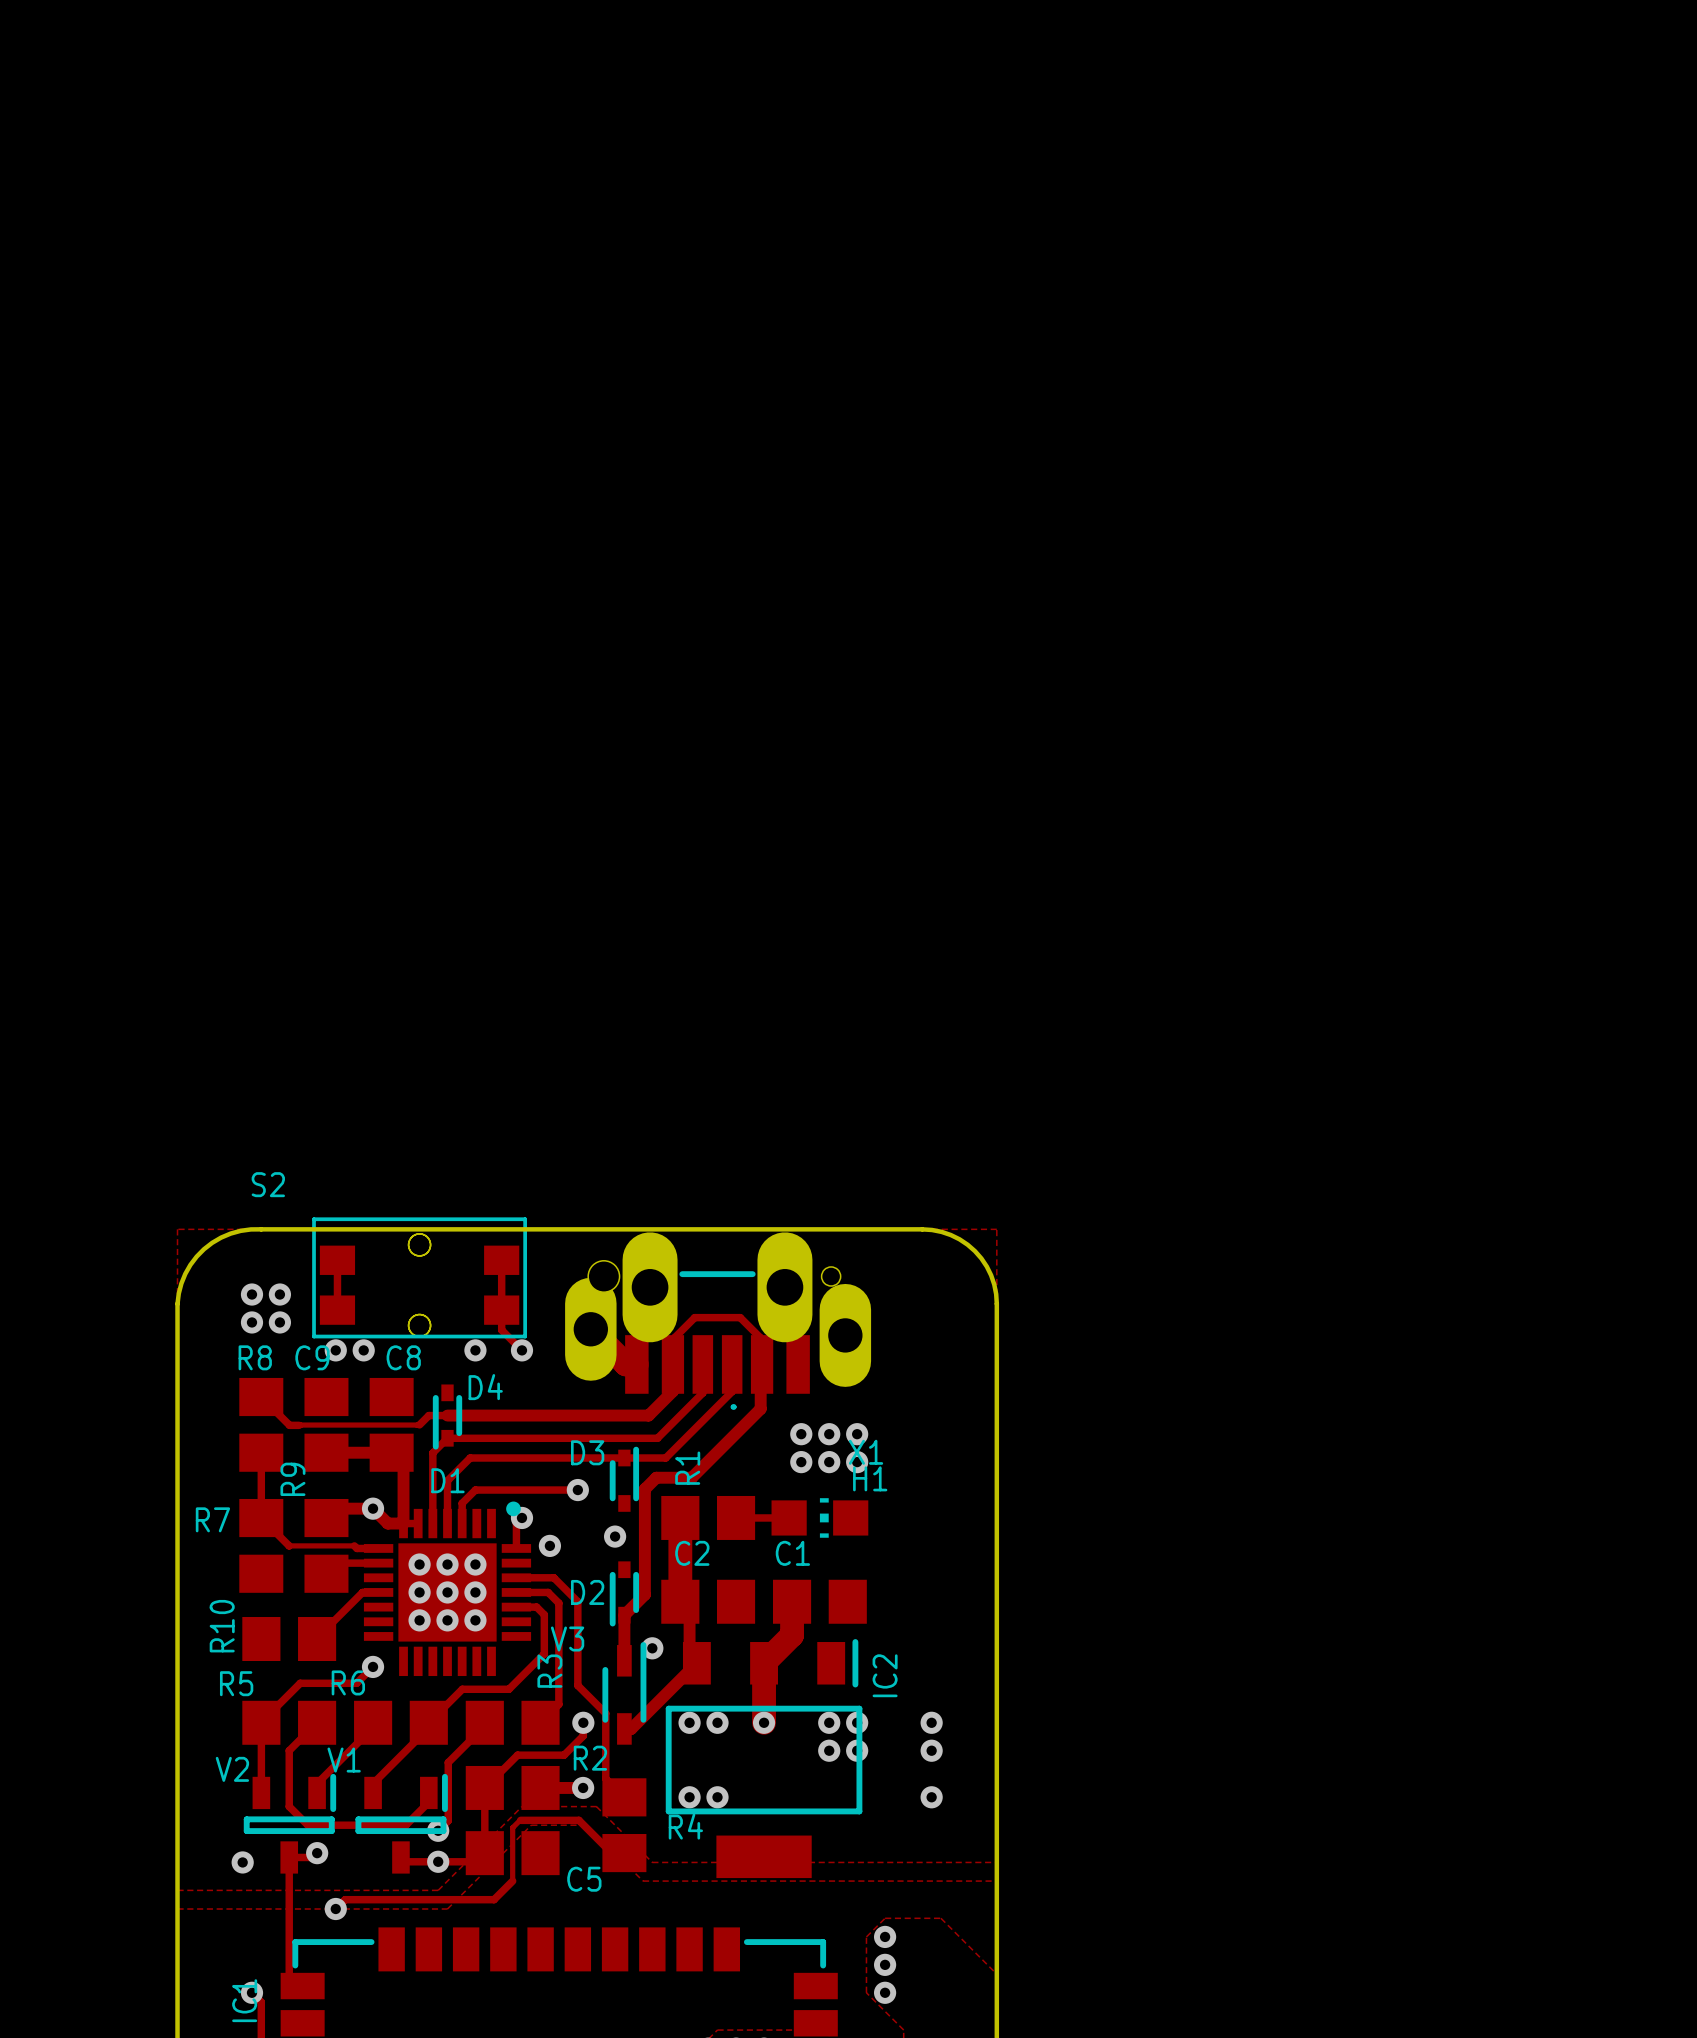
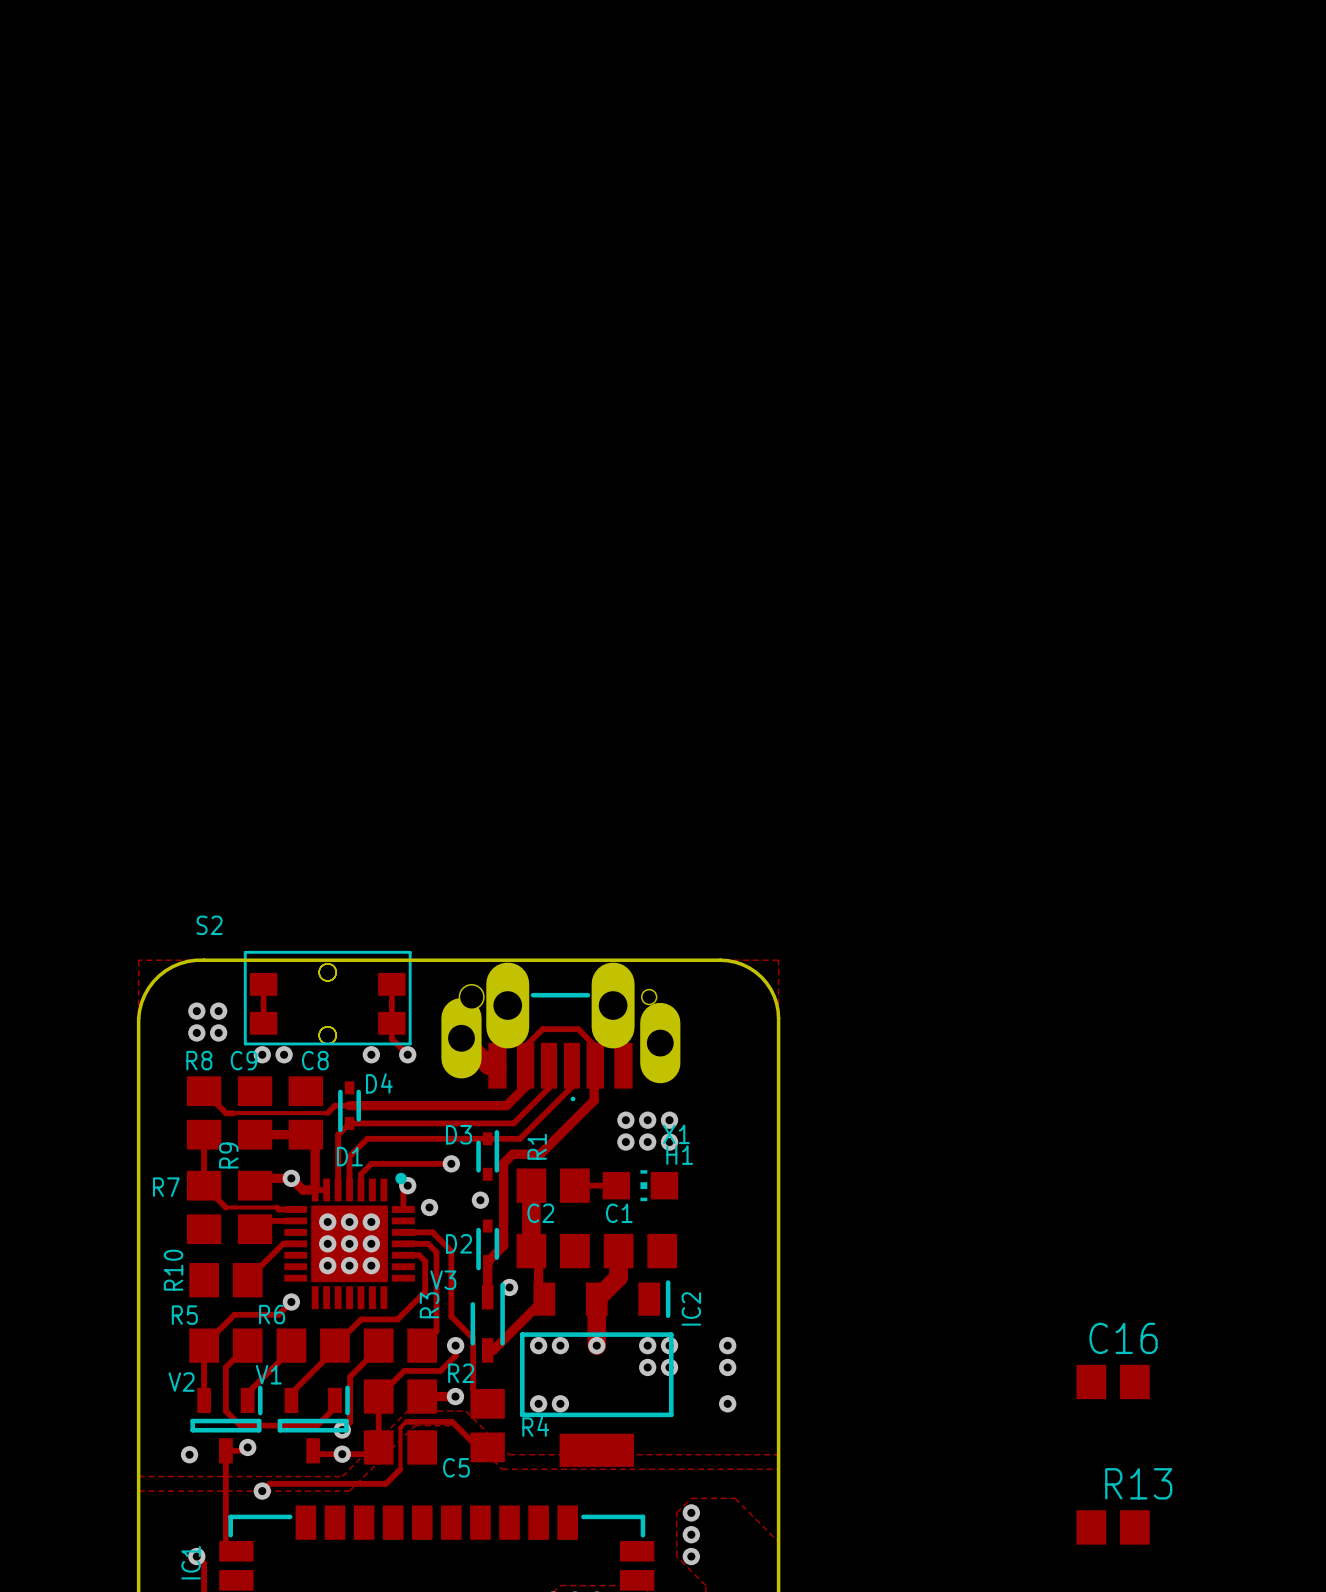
C16: none -> (1113, 1382)
R13: none -> (1113, 1527)

